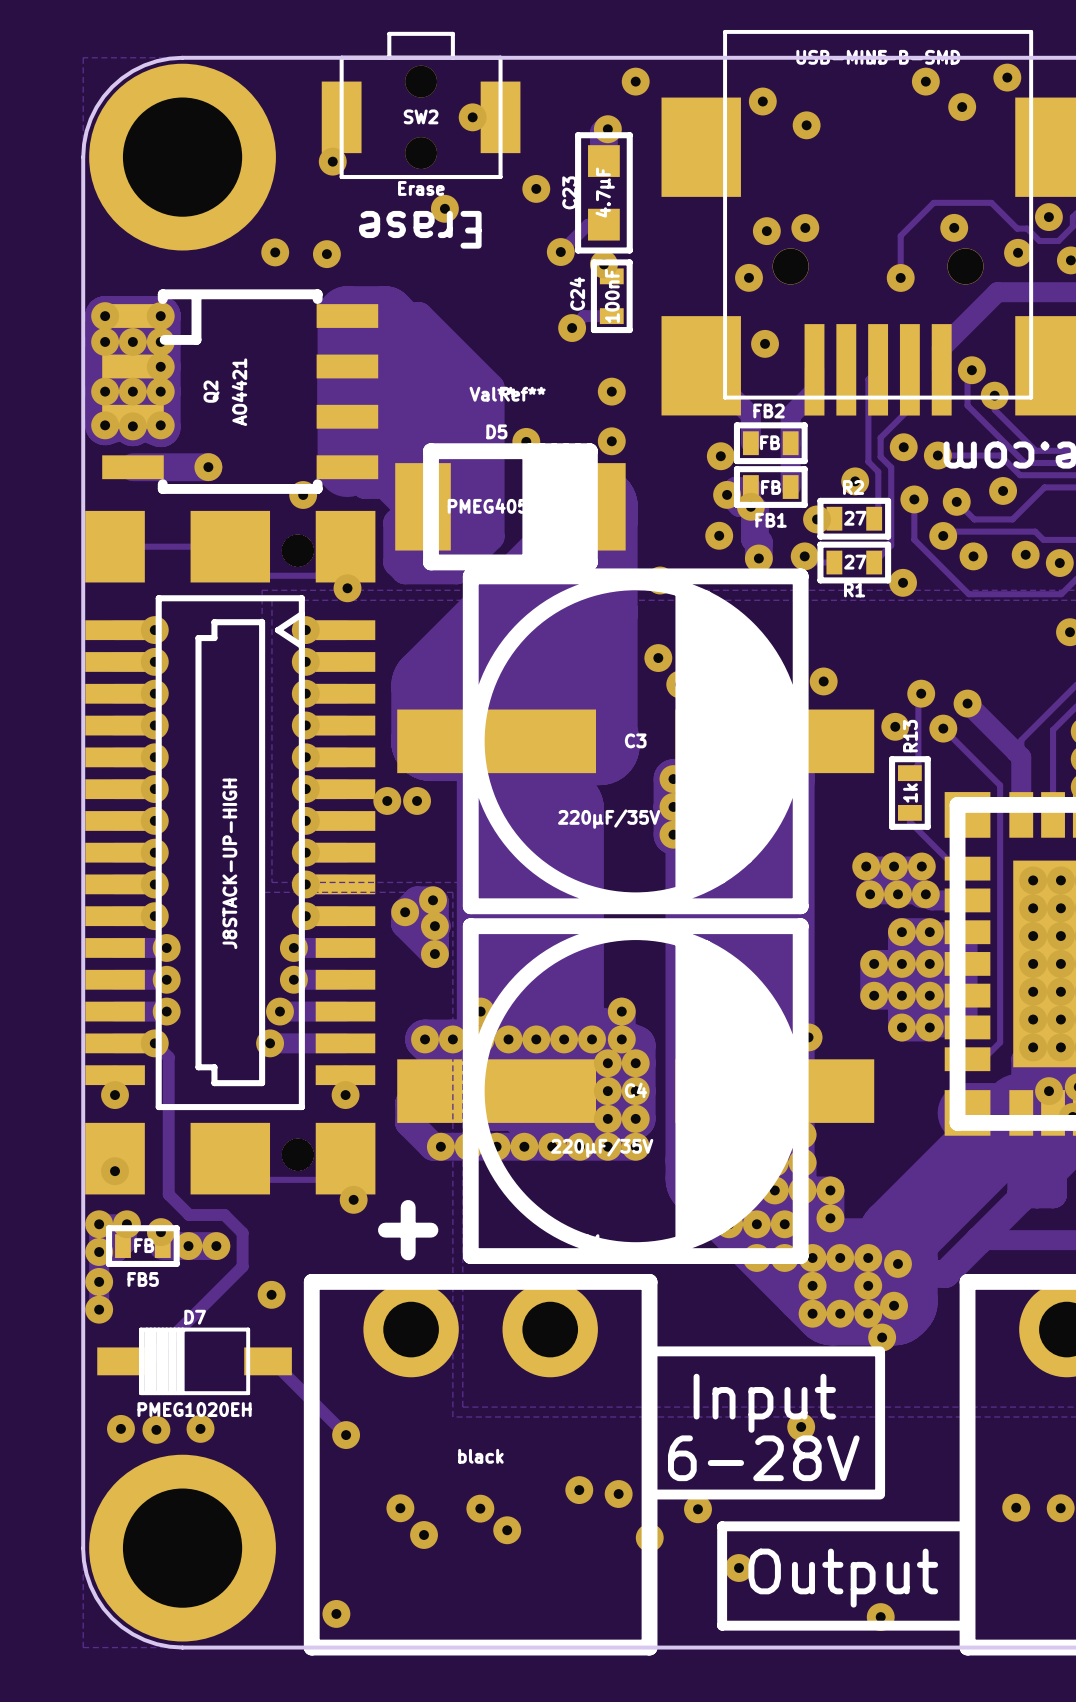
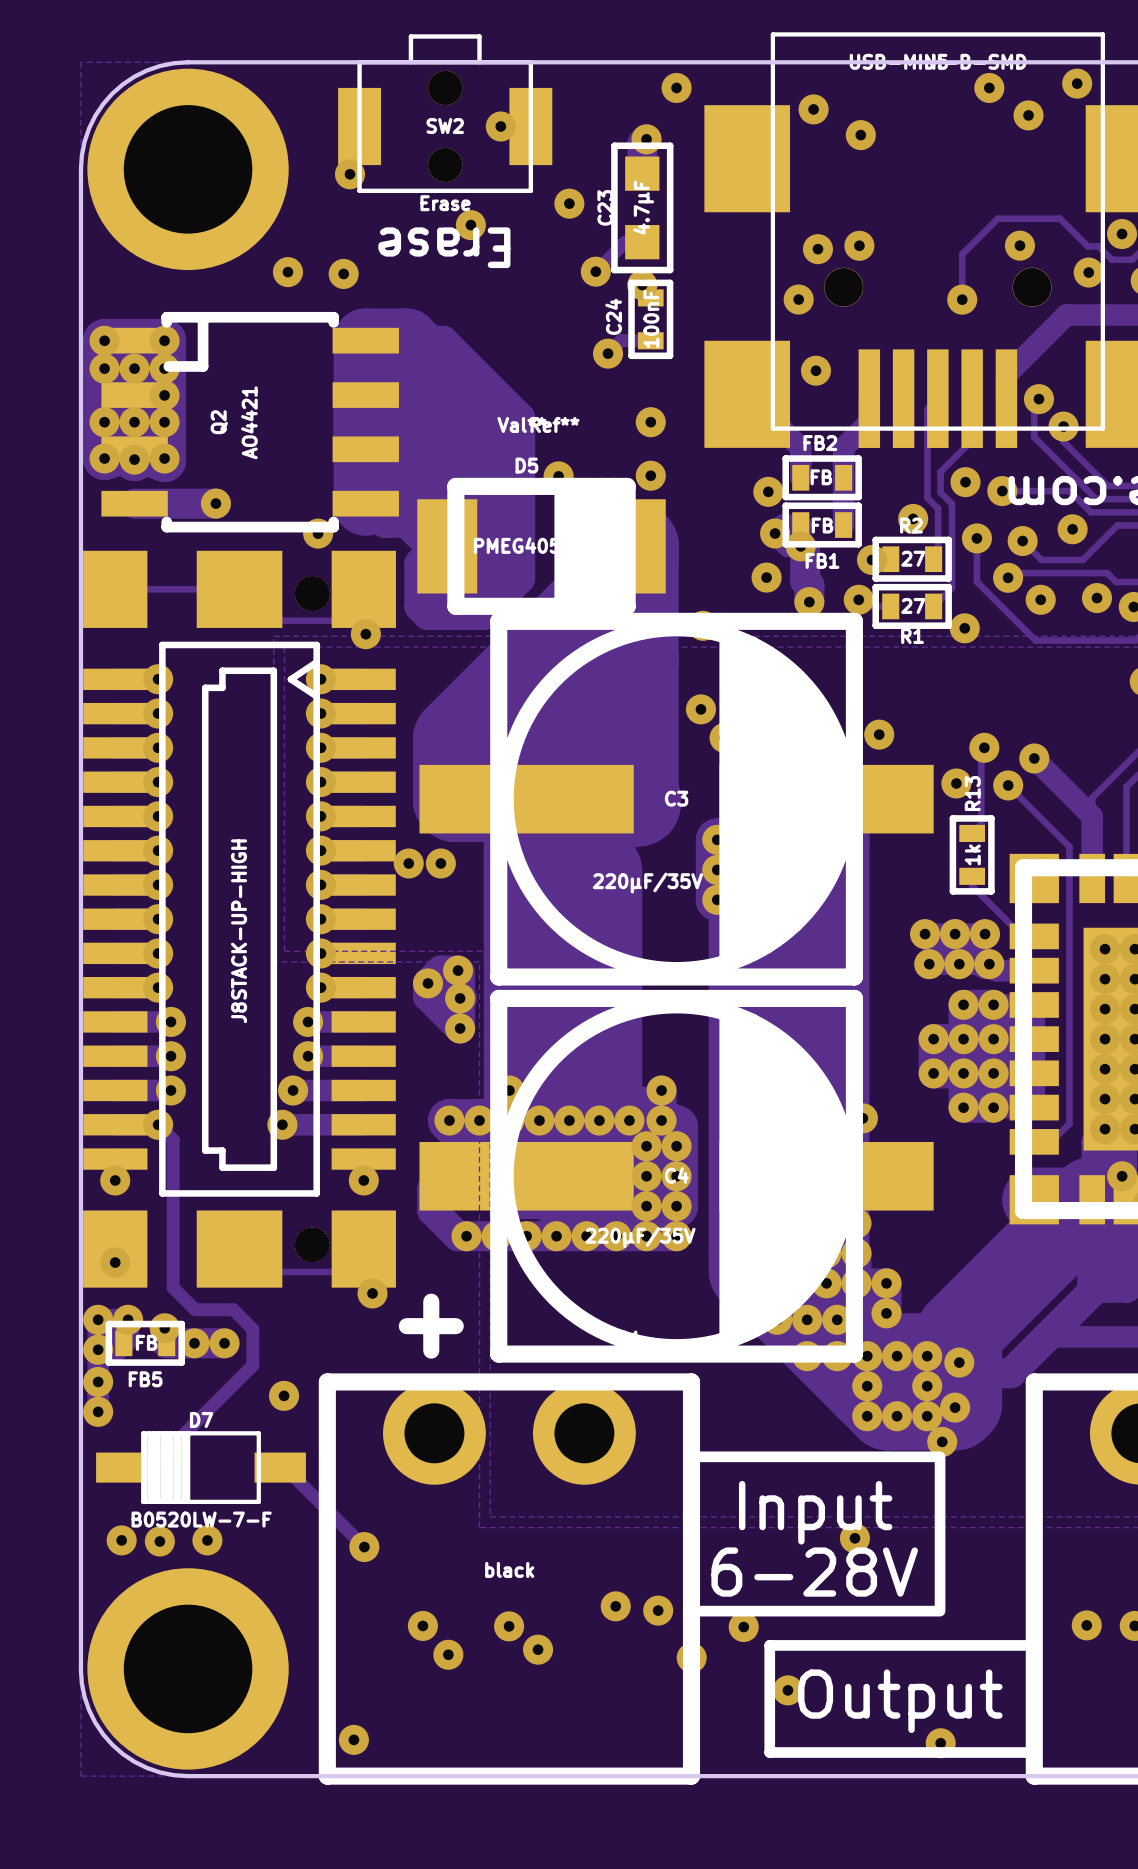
D7 value: PMEG1020EH (194, 1409) -> B0520LW-7-F (201, 1519)

